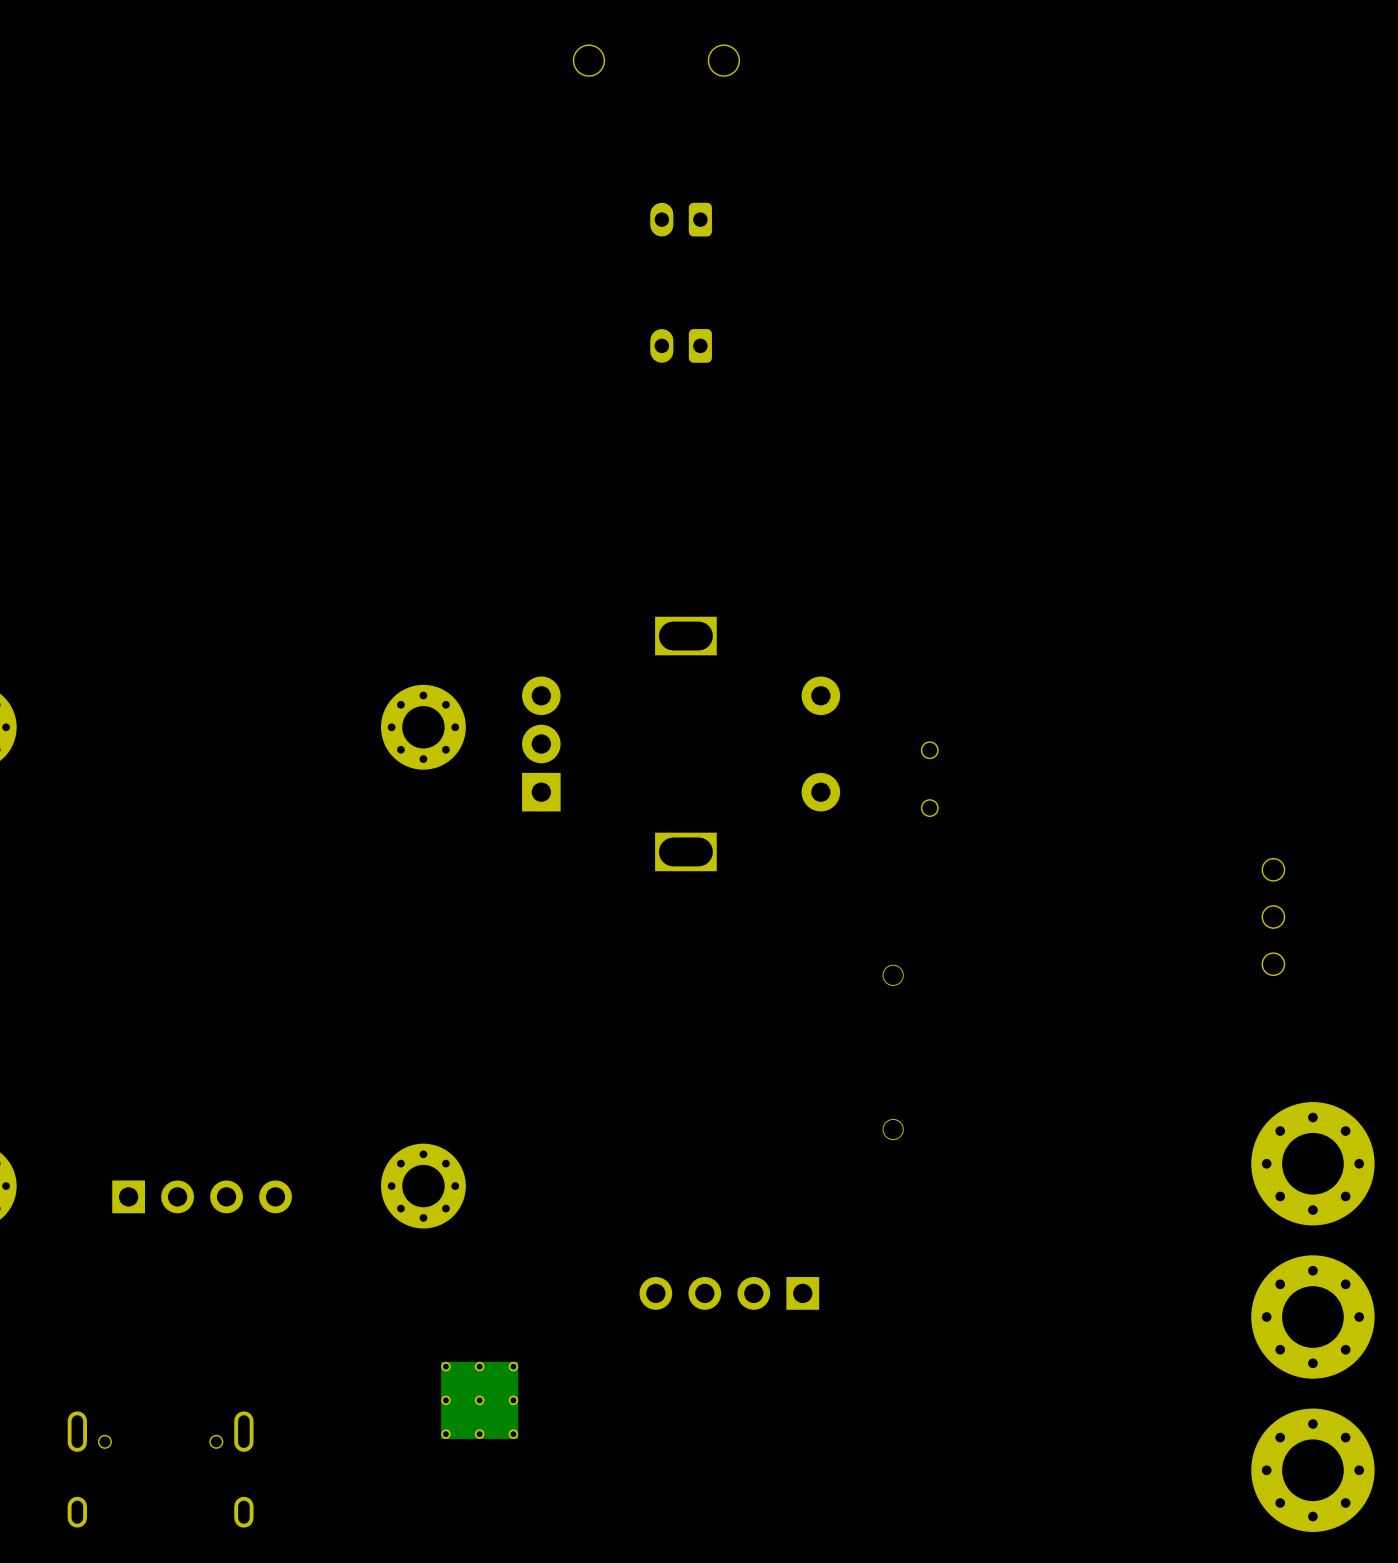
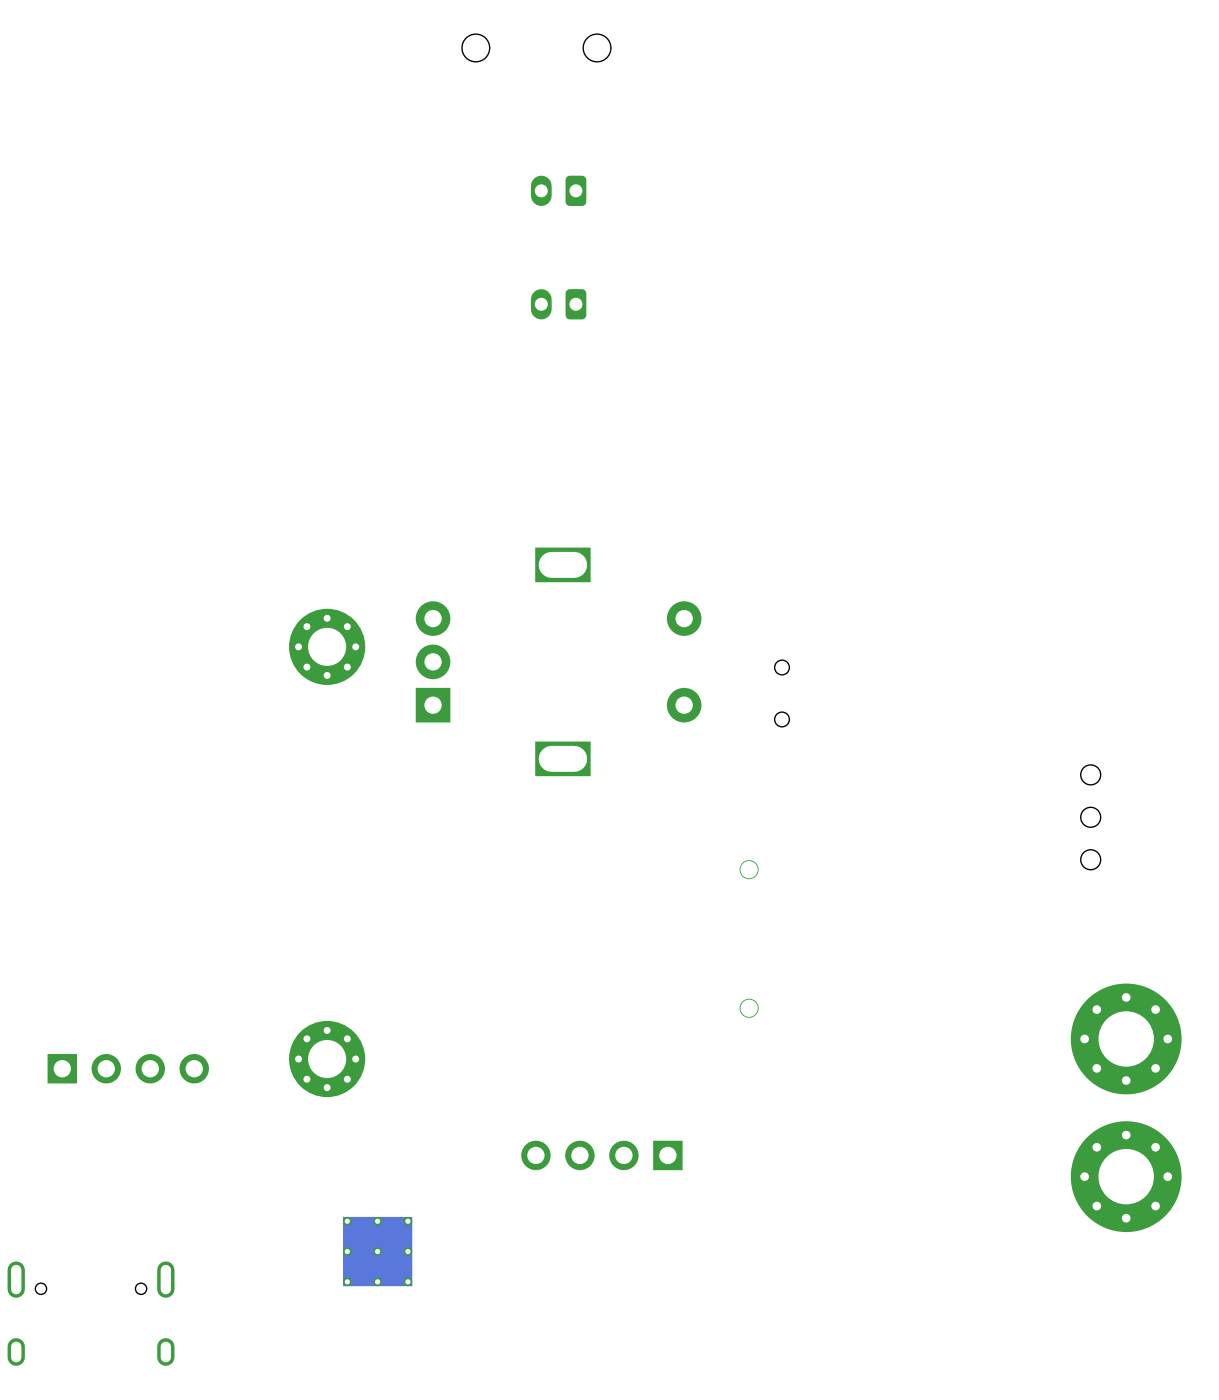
part: (1312, 1470) -> none

